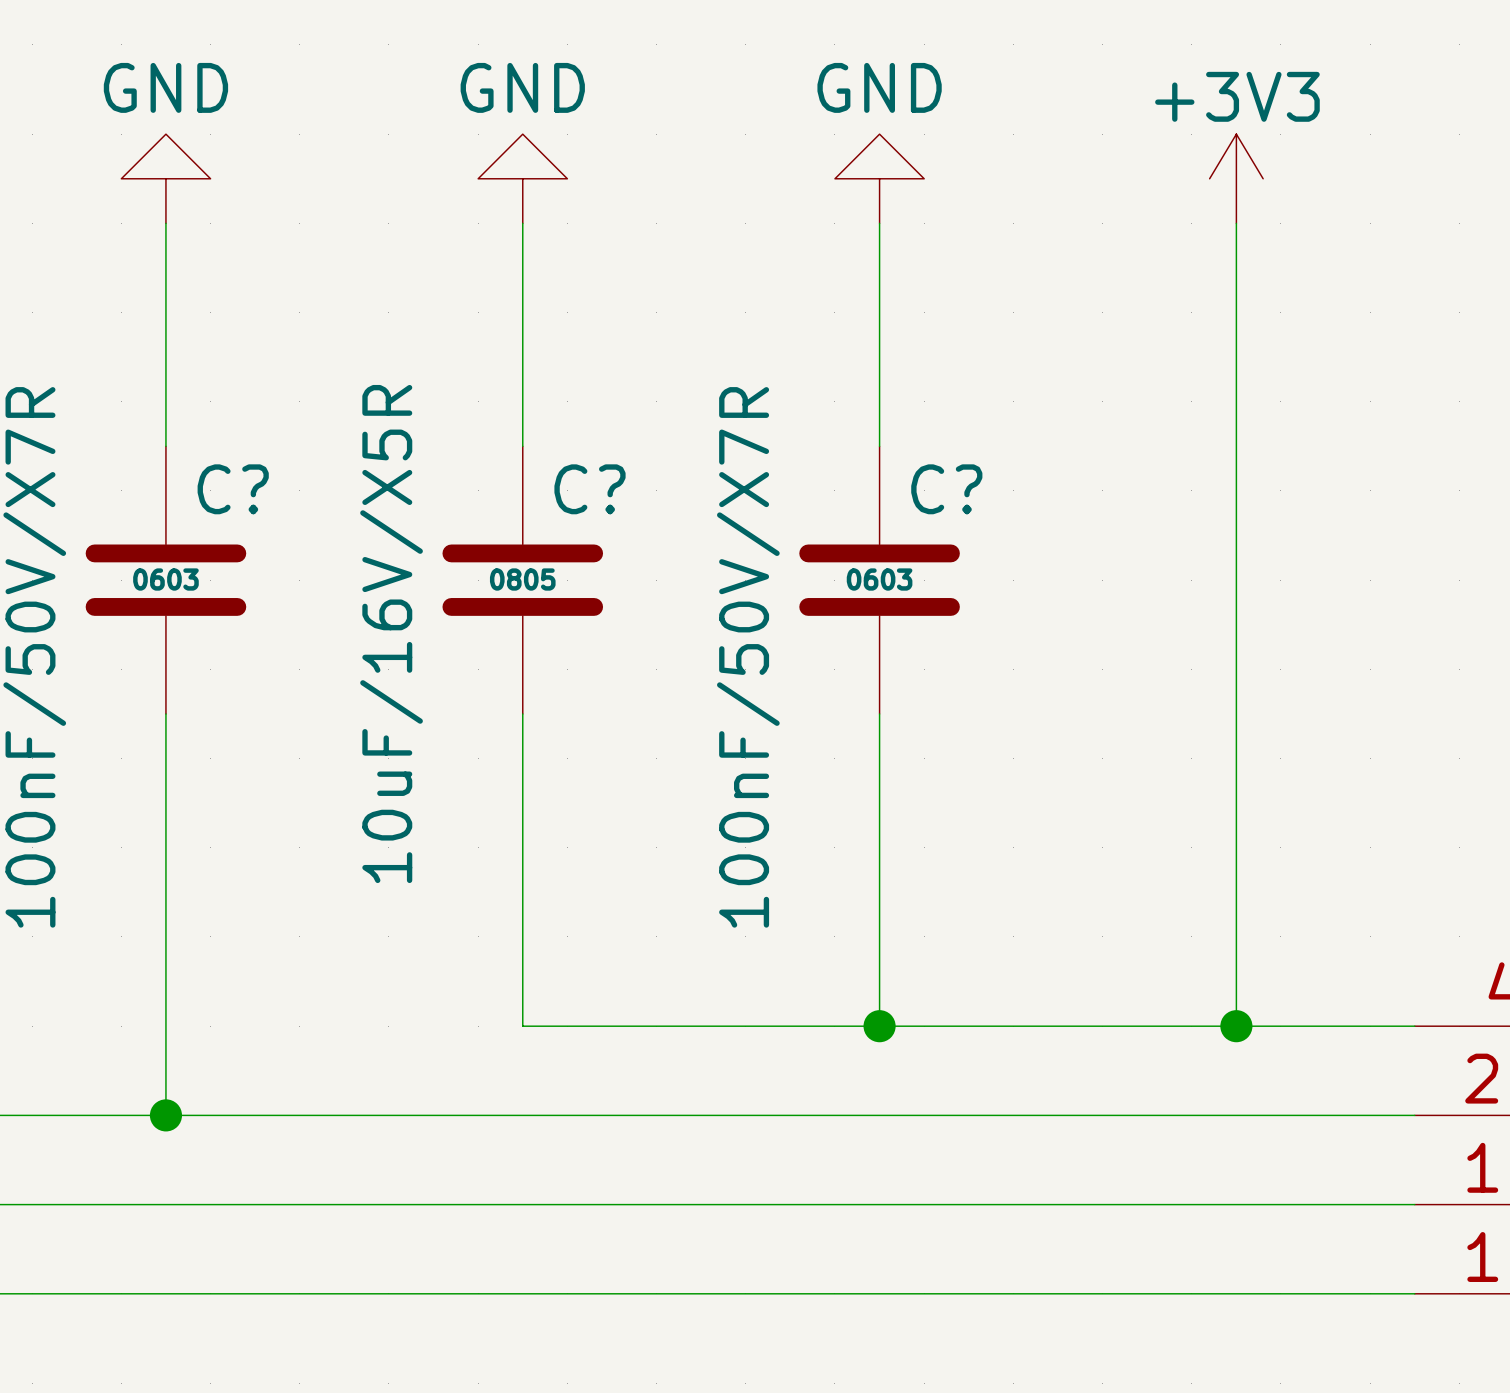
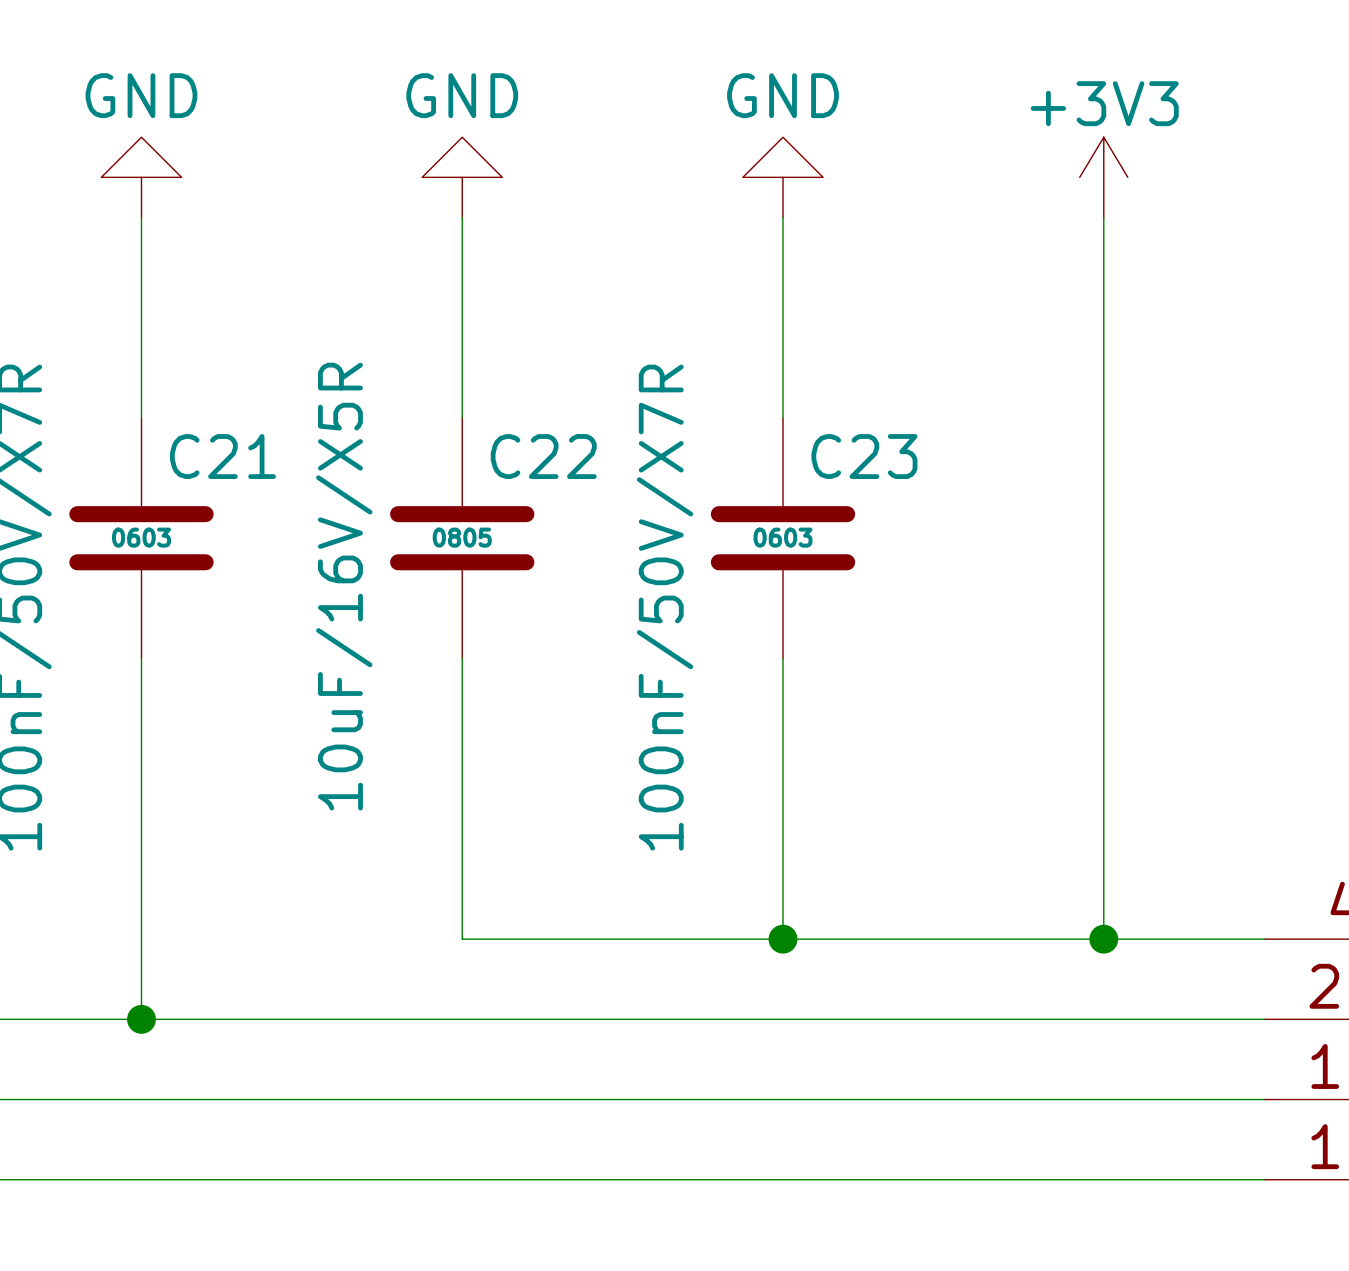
C? name: C? (233, 489) -> C21 (222, 456)
C? name: C? (590, 489) -> C22 (543, 456)
C? name: C? (946, 489) -> C23 (864, 456)

